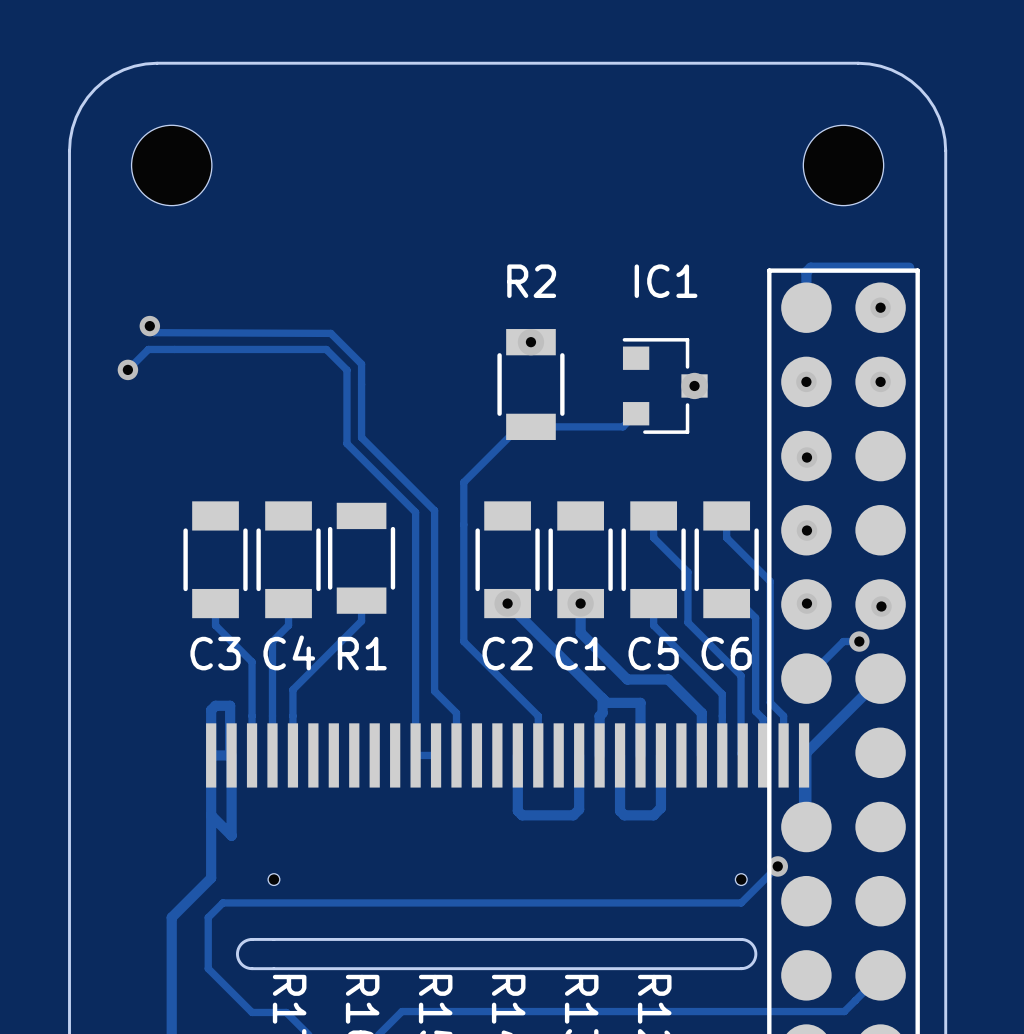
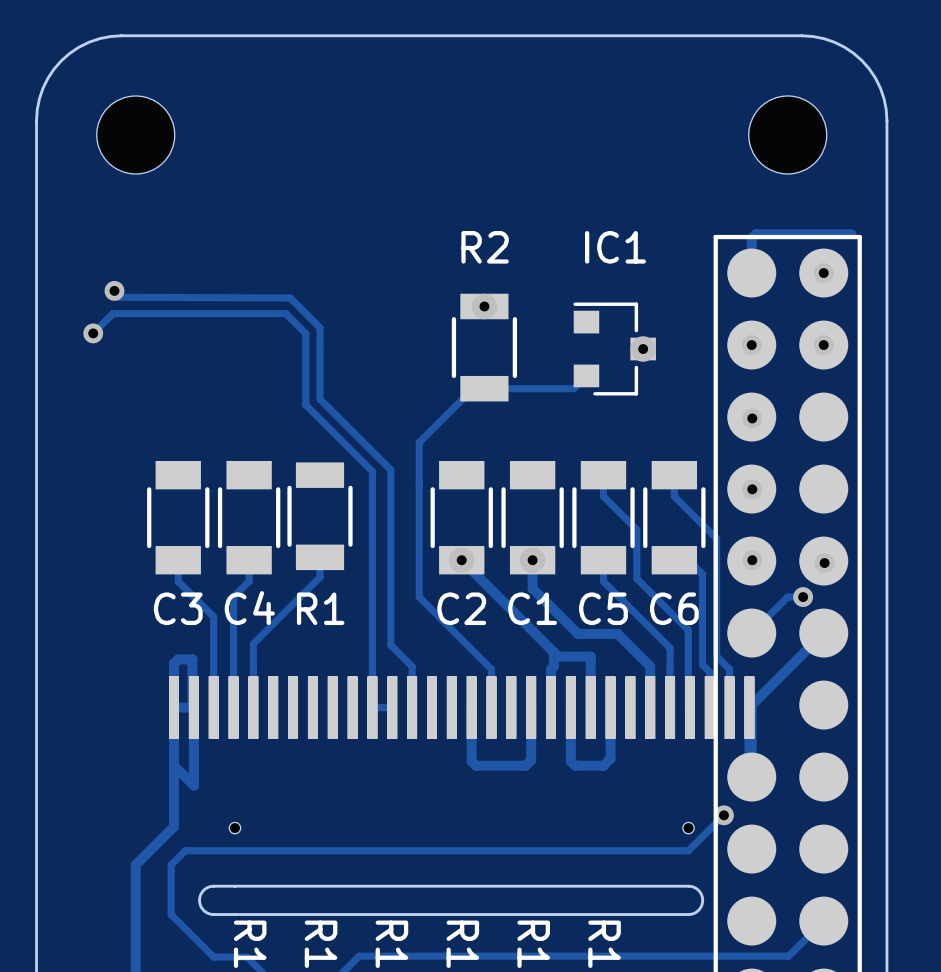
part: none -> (461, 707)

